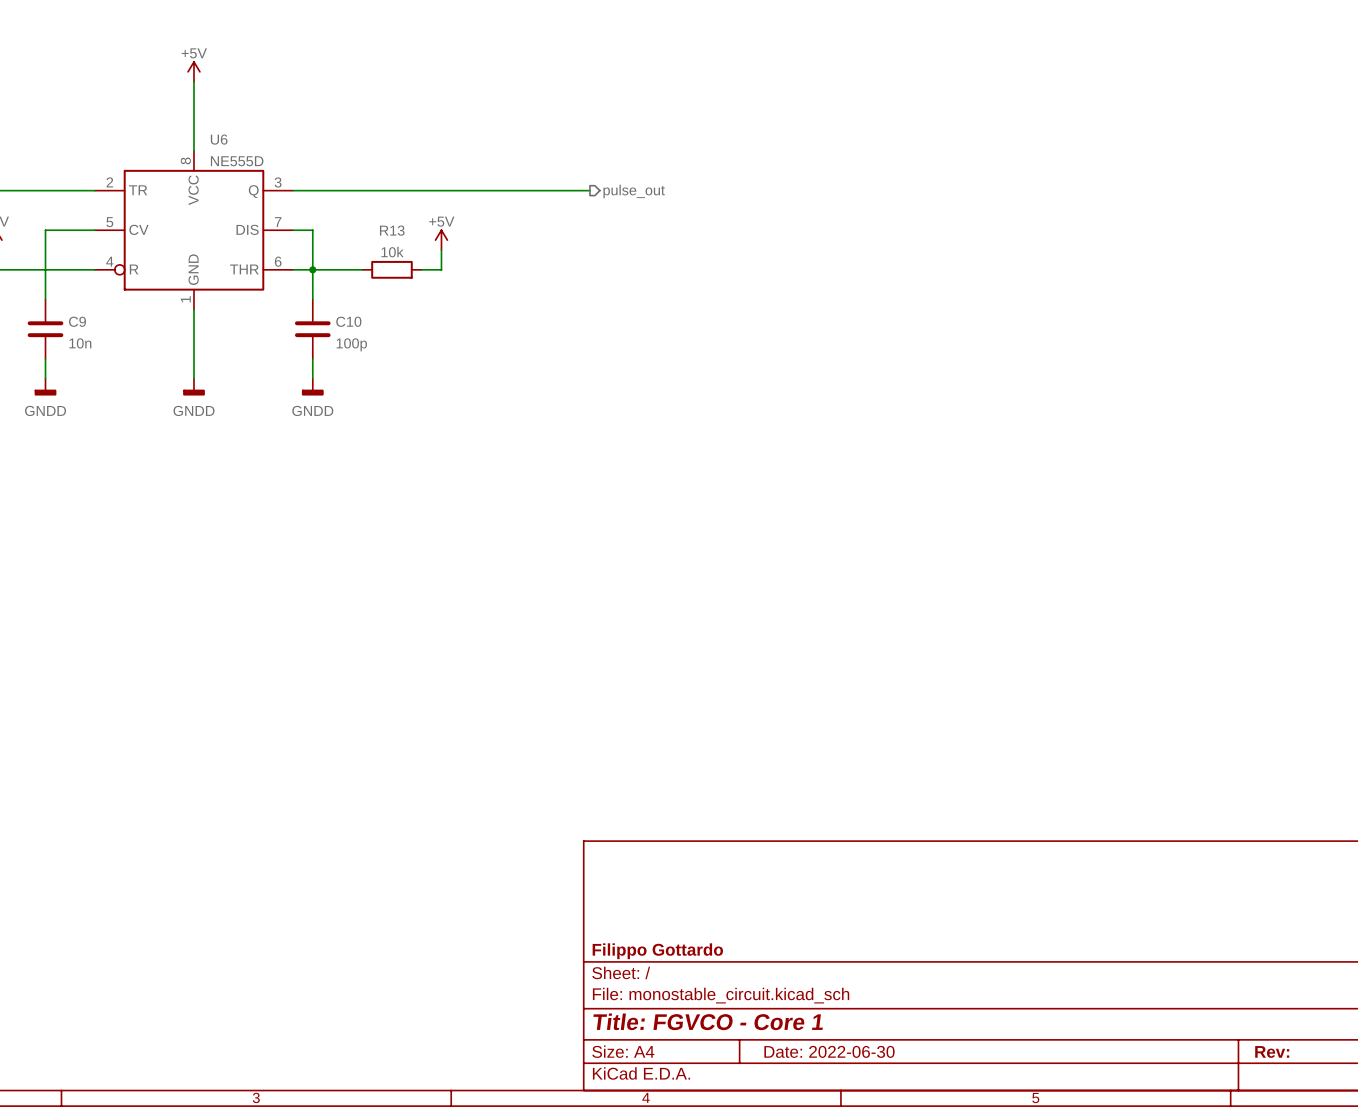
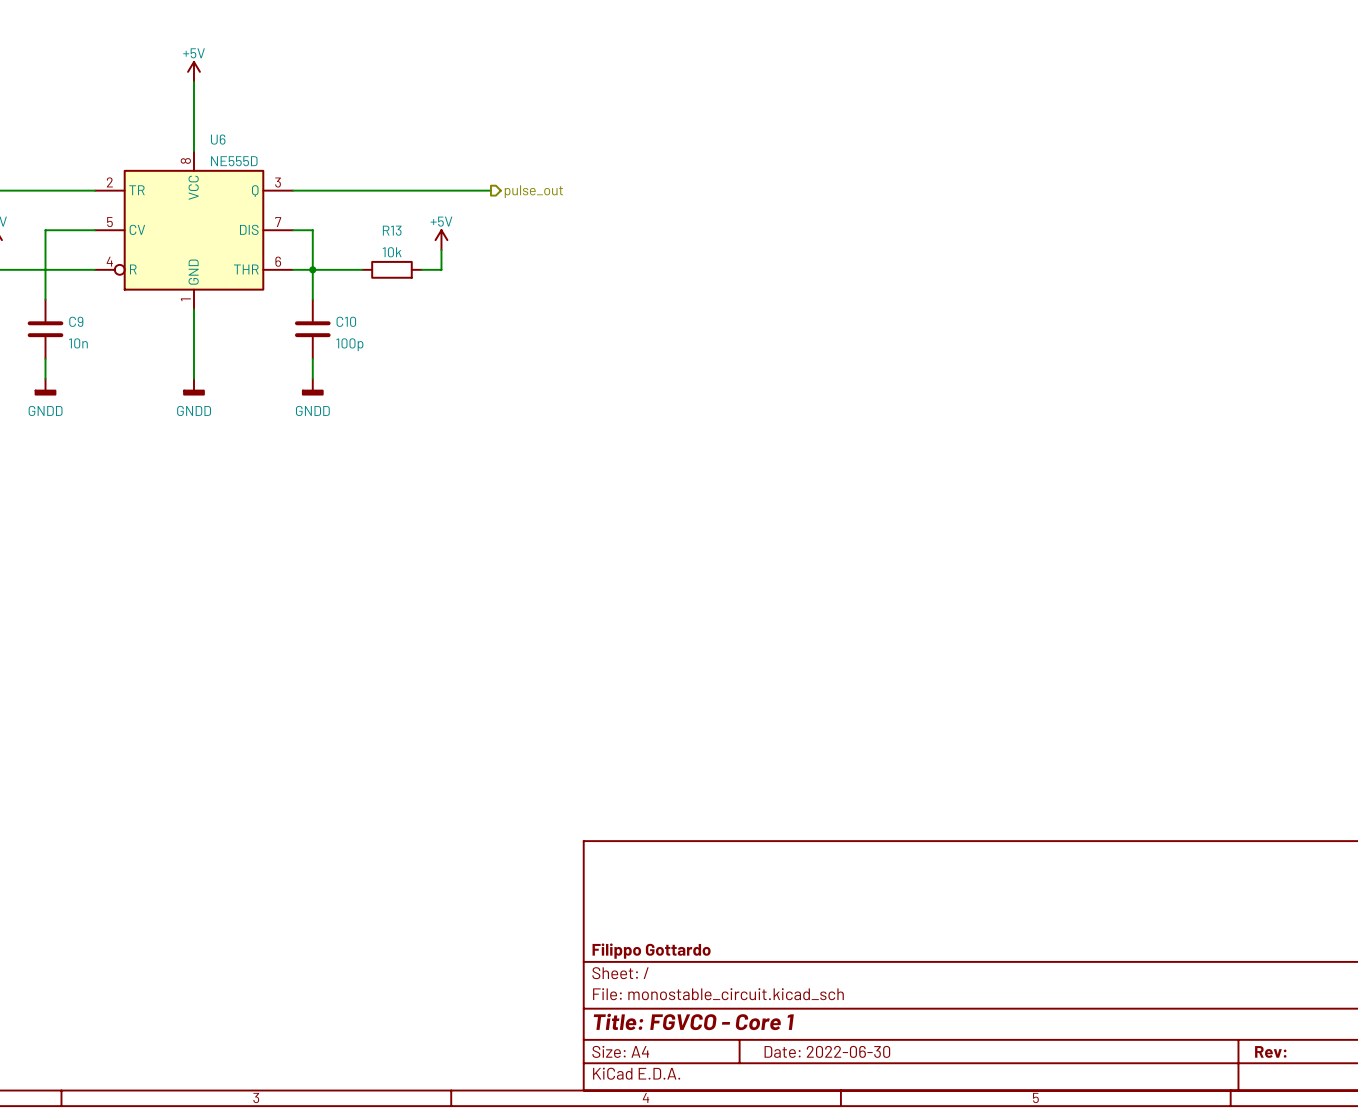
wire: (490, 190) (589, 190) -> none
hierarchical label position: pulse_out (634, 191) -> pulse_out (533, 191)

